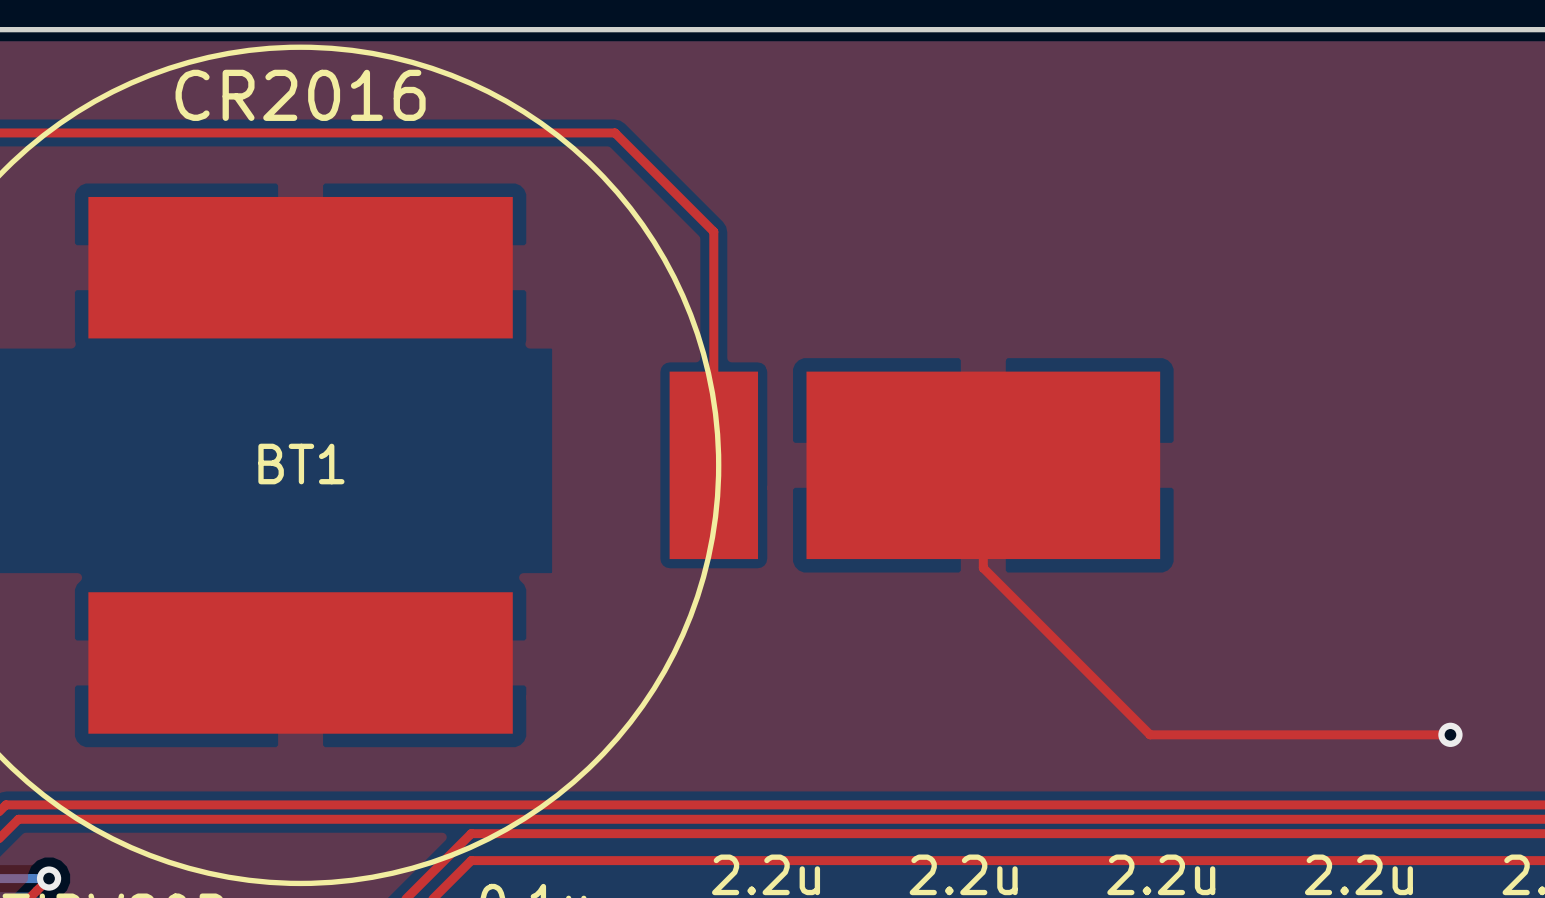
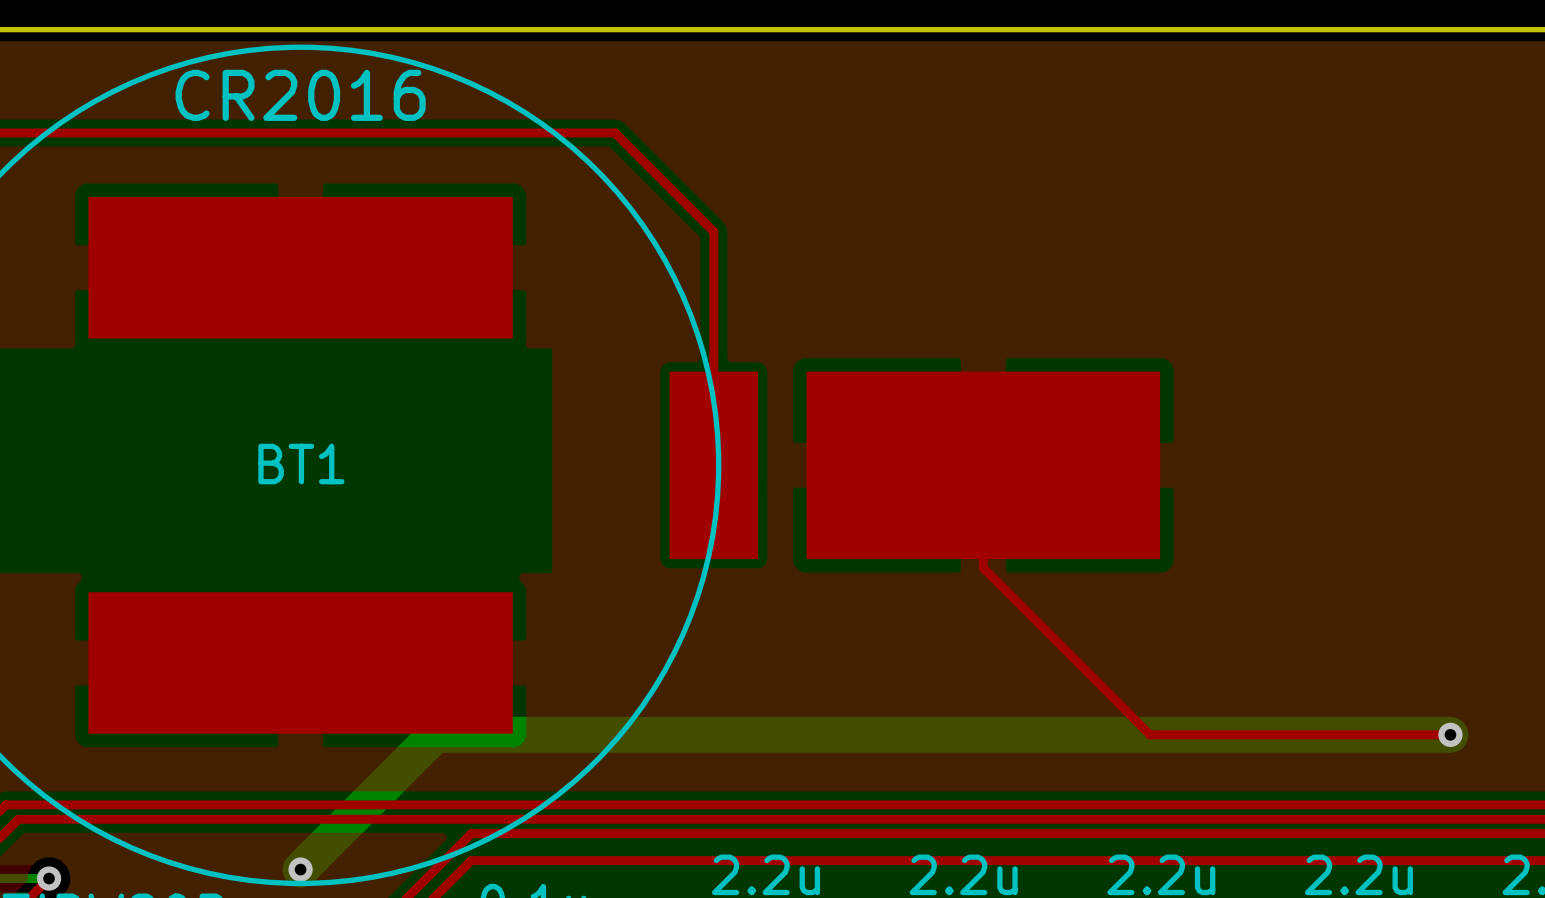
bottom track: none -> (1450, 734) (435, 734) (300, 869)
via: none -> (300, 869)

